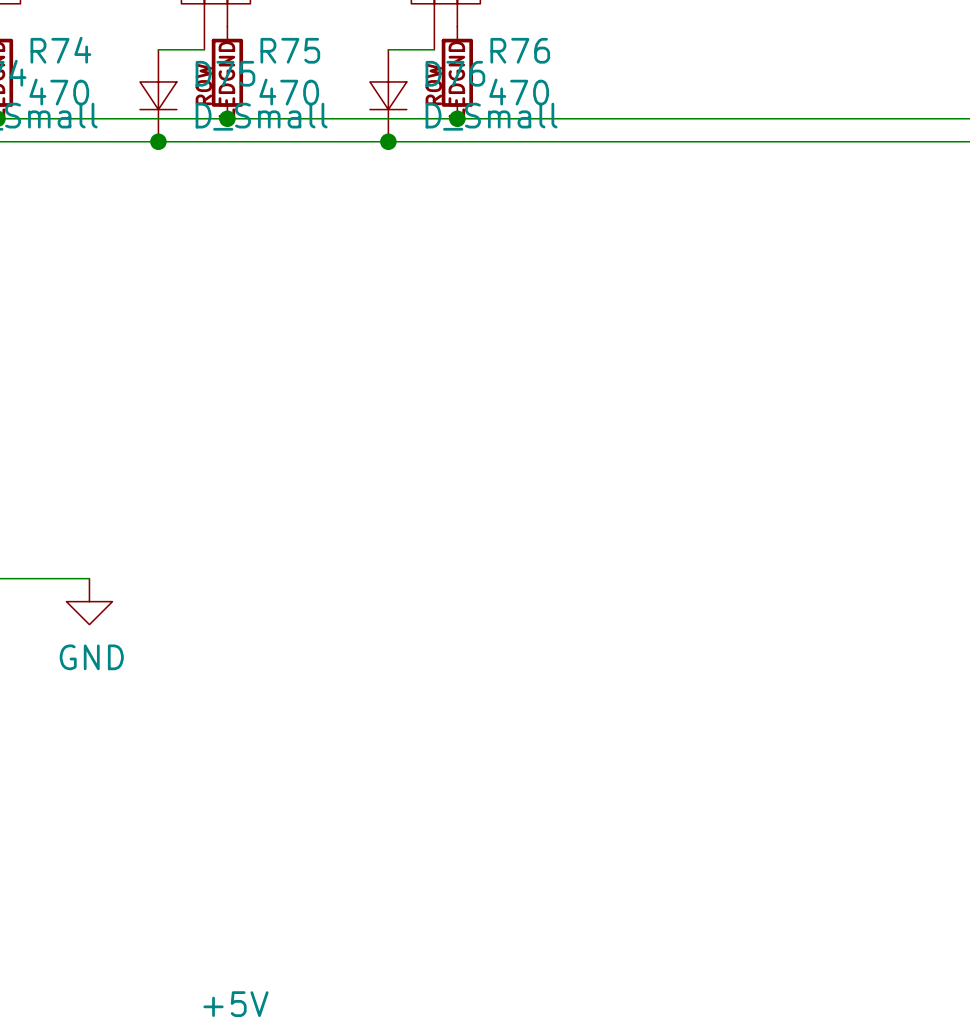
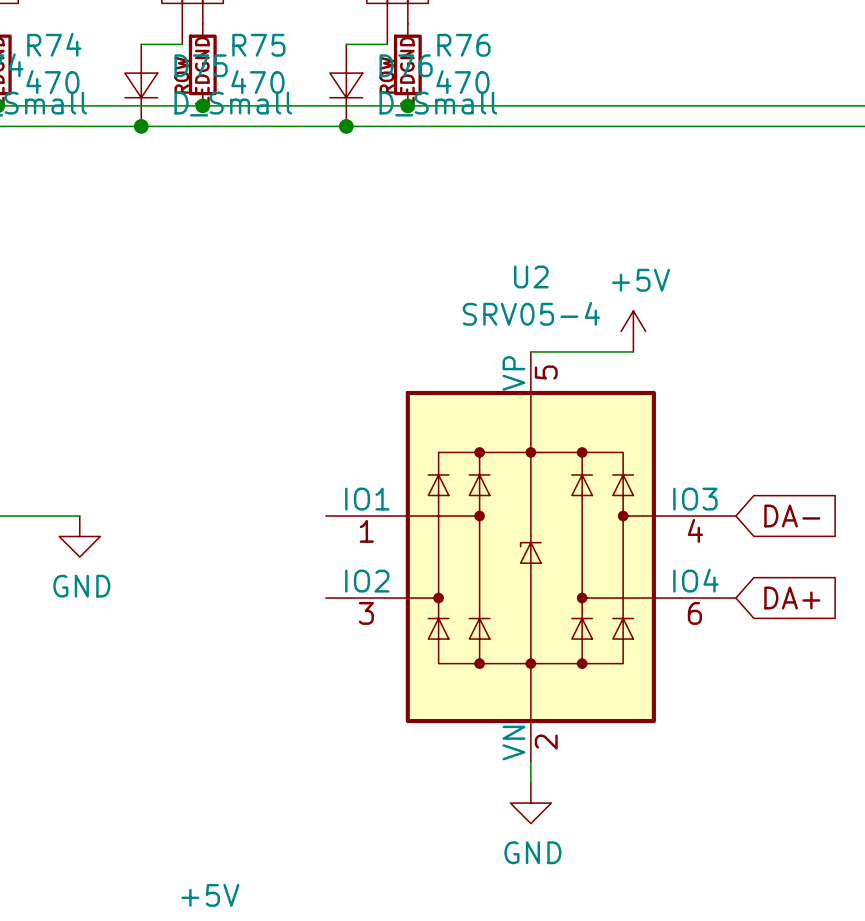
power symbol: none -> +5V (633, 331)
wire: none -> (530, 351) (633, 351)
global label: none -> DA- (792, 516)
U2: none -> SRV05-4 (530, 557)
global label: none -> DA+ (792, 598)
wire: none -> (530, 762) (530, 782)
power symbol: none -> GND (530, 803)

